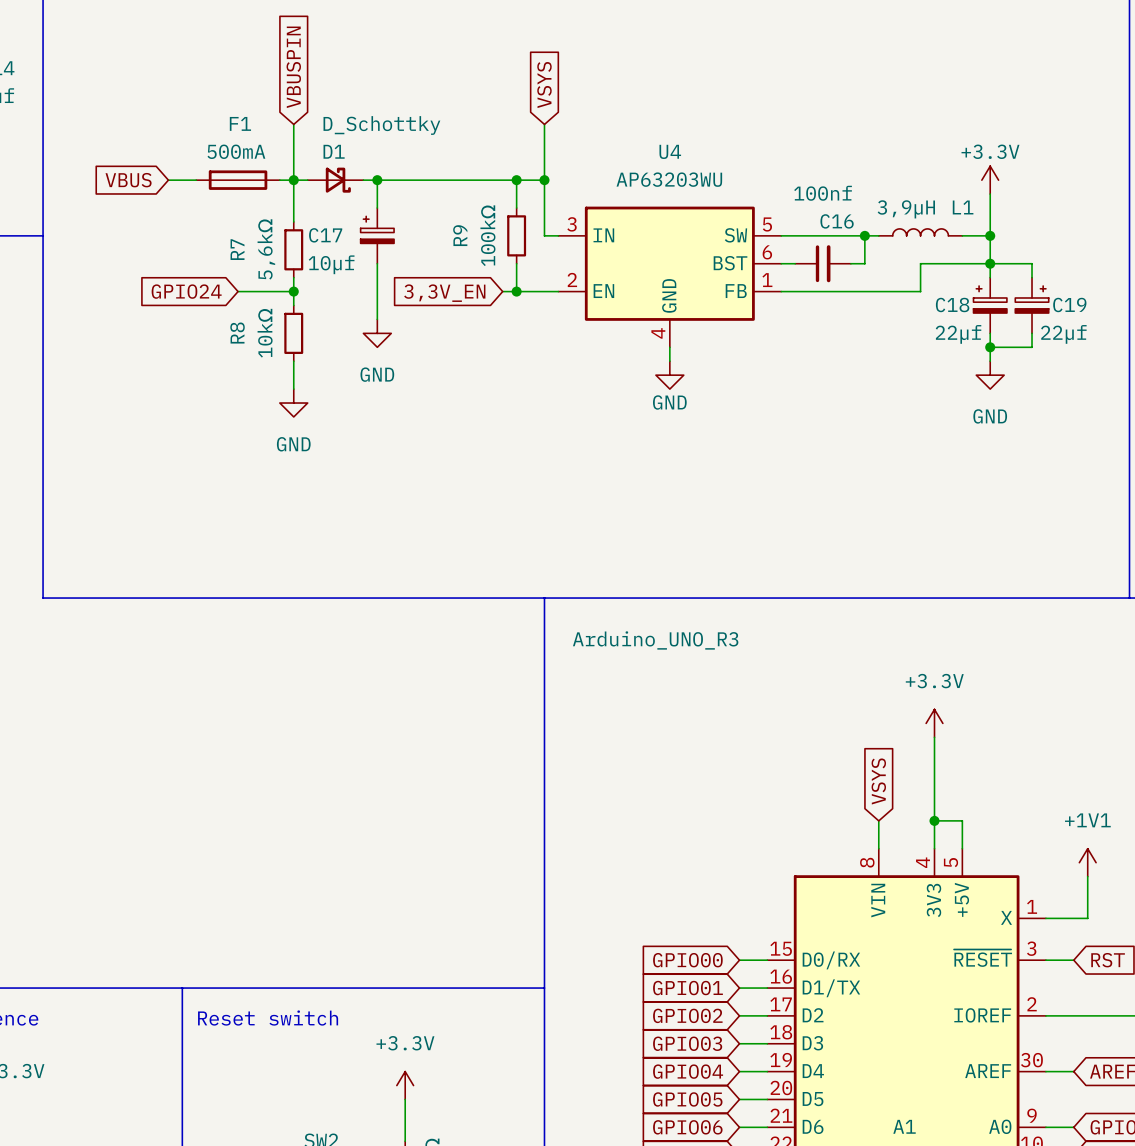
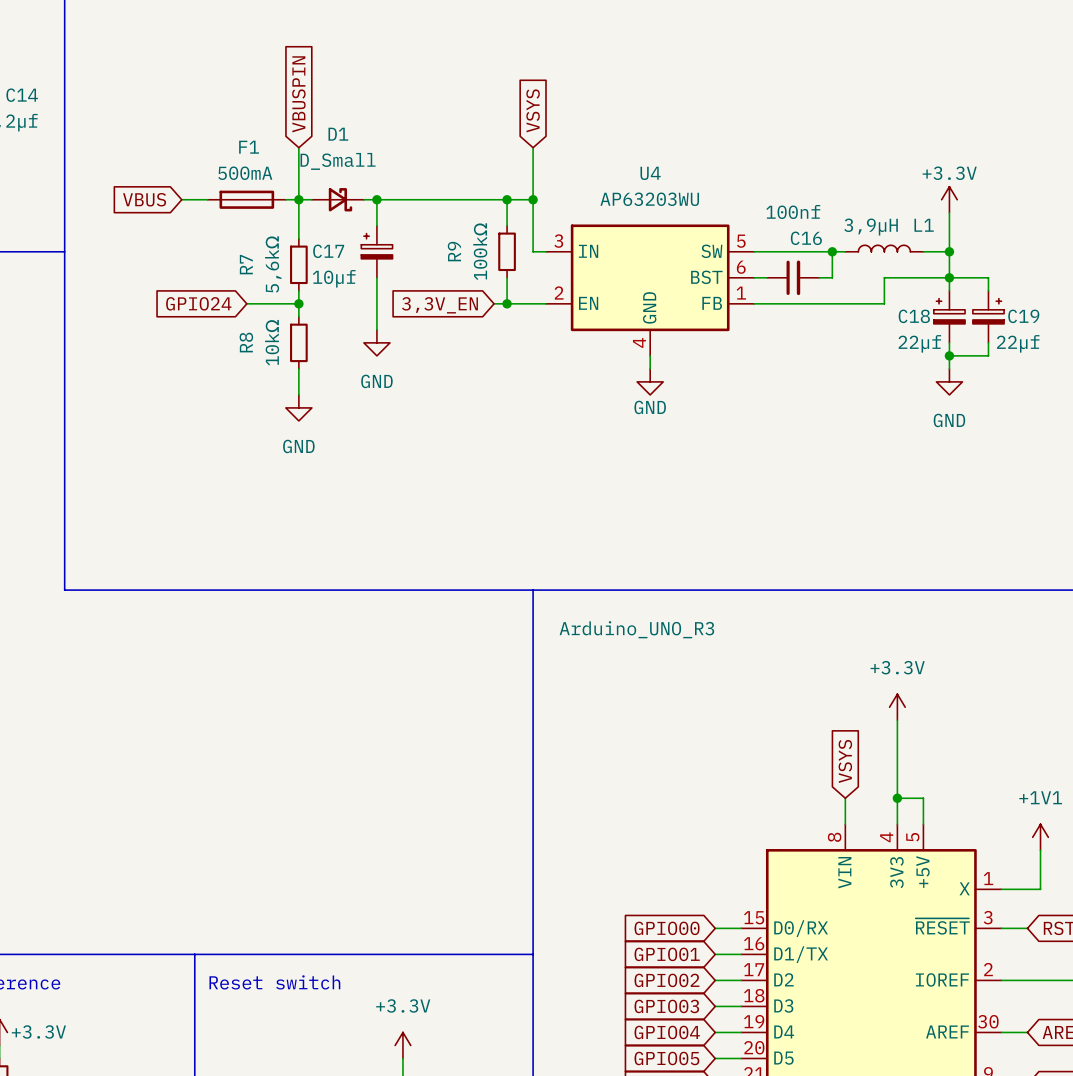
D1 value: D_Schottky (381, 125) -> D_Small (338, 161)
D1 name position: D1 (334, 151) -> D1 (338, 134)

